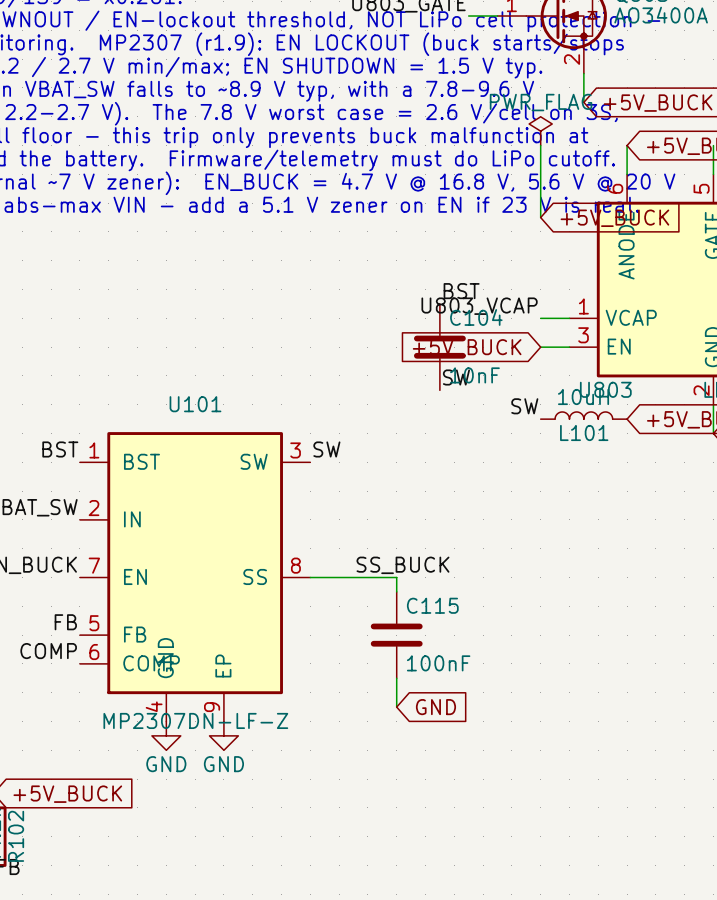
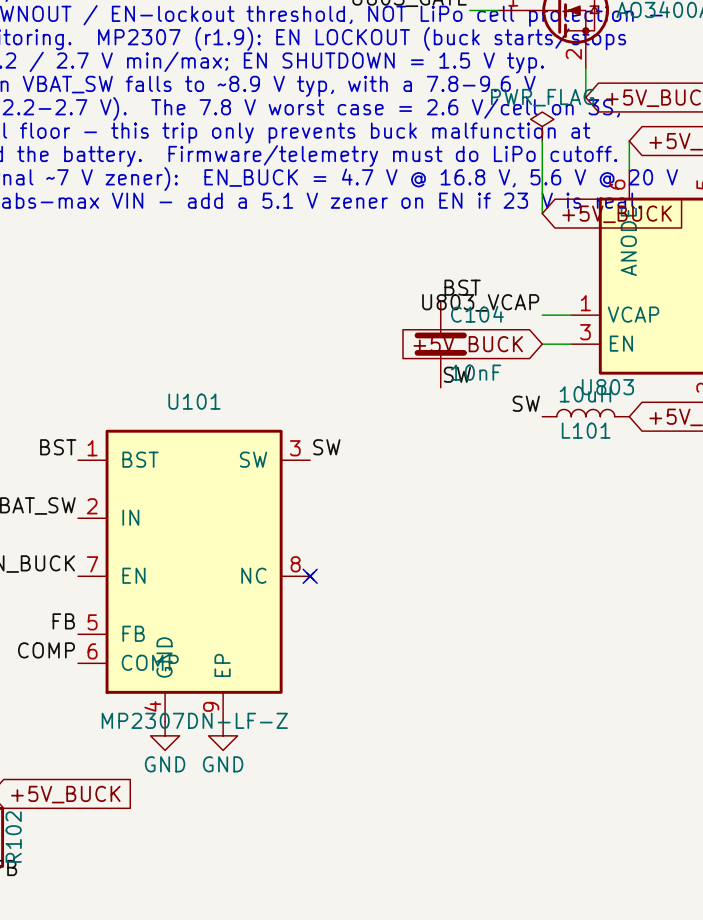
U101 symbol: [79, 432, 311, 722] -> [78, 429, 314, 722]
label: SS_BUCK (402, 565) -> none
wire: (310, 577) (396, 577) (396, 591) -> none
no-connect mark: none -> (310, 576)
C115: 100nF (396, 635) -> none
wire: (396, 678) (396, 707) -> none
global label: GND (435, 707) -> none

